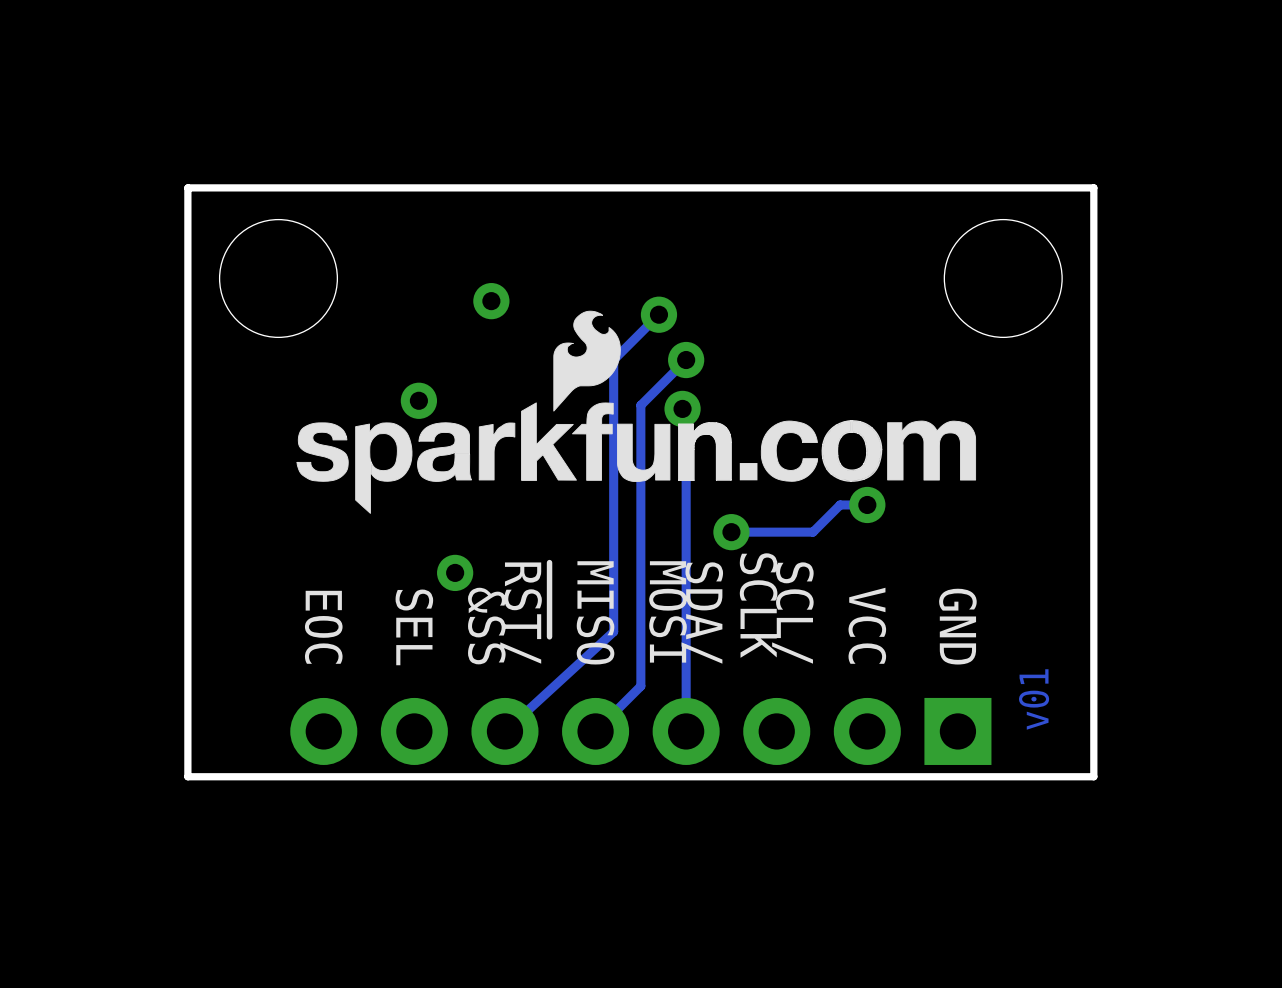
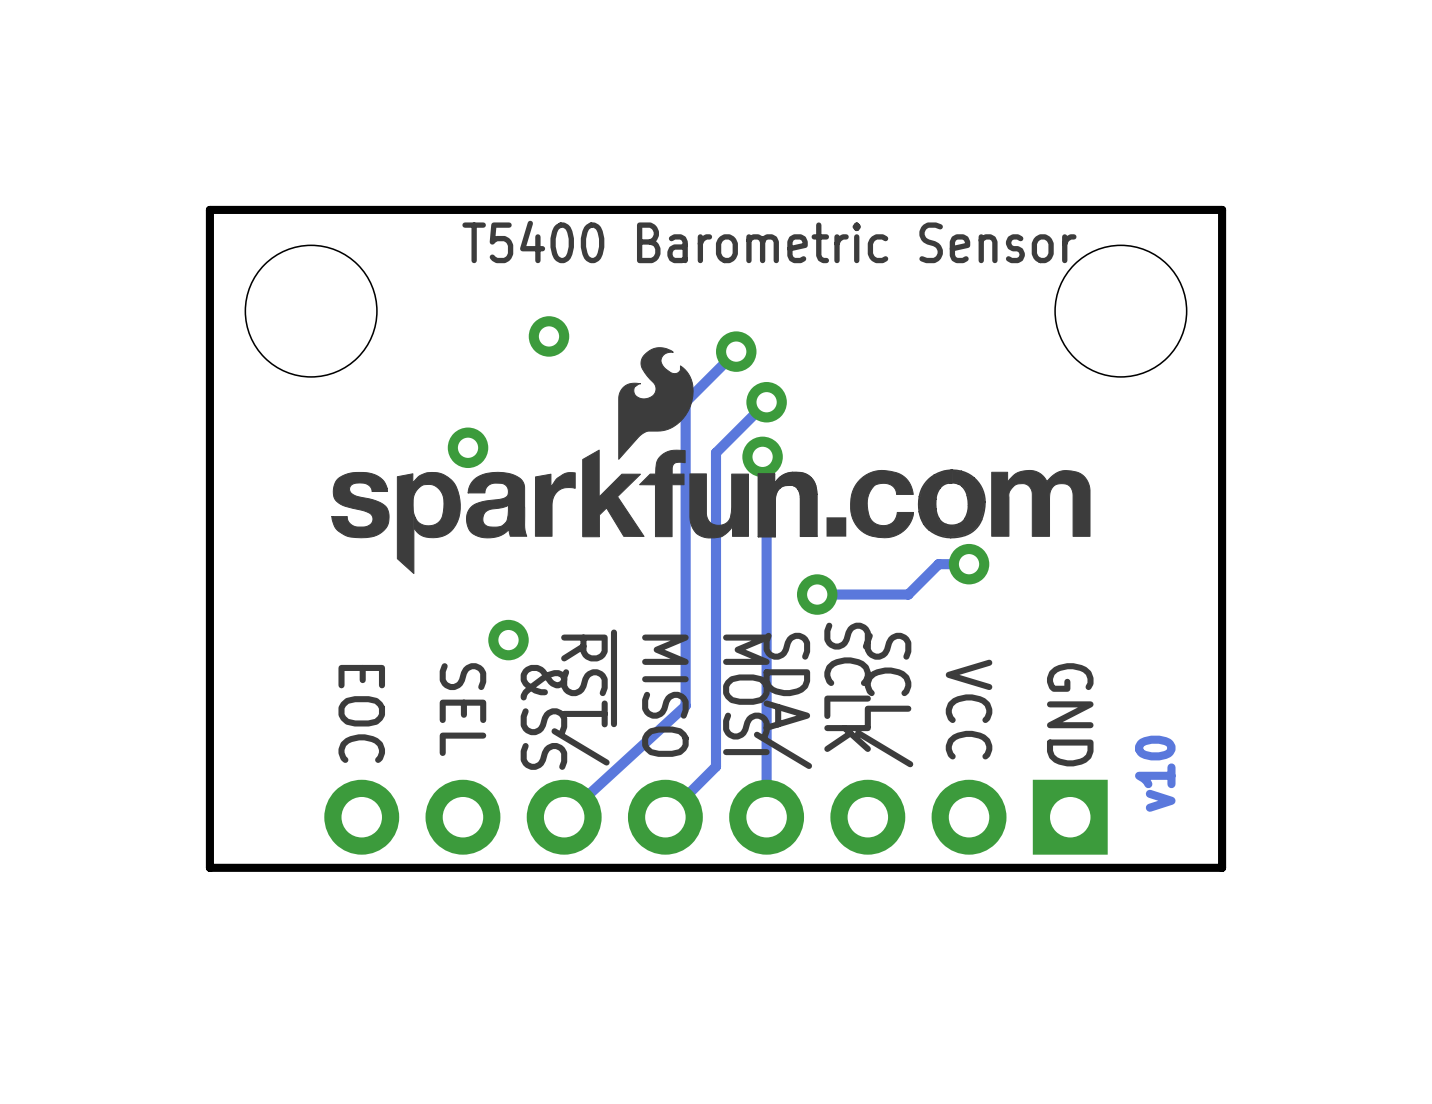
text: none -> T5400 Barometric Sensor (769, 241)
text: v01 (1034, 699) -> v10 (1155, 773)

